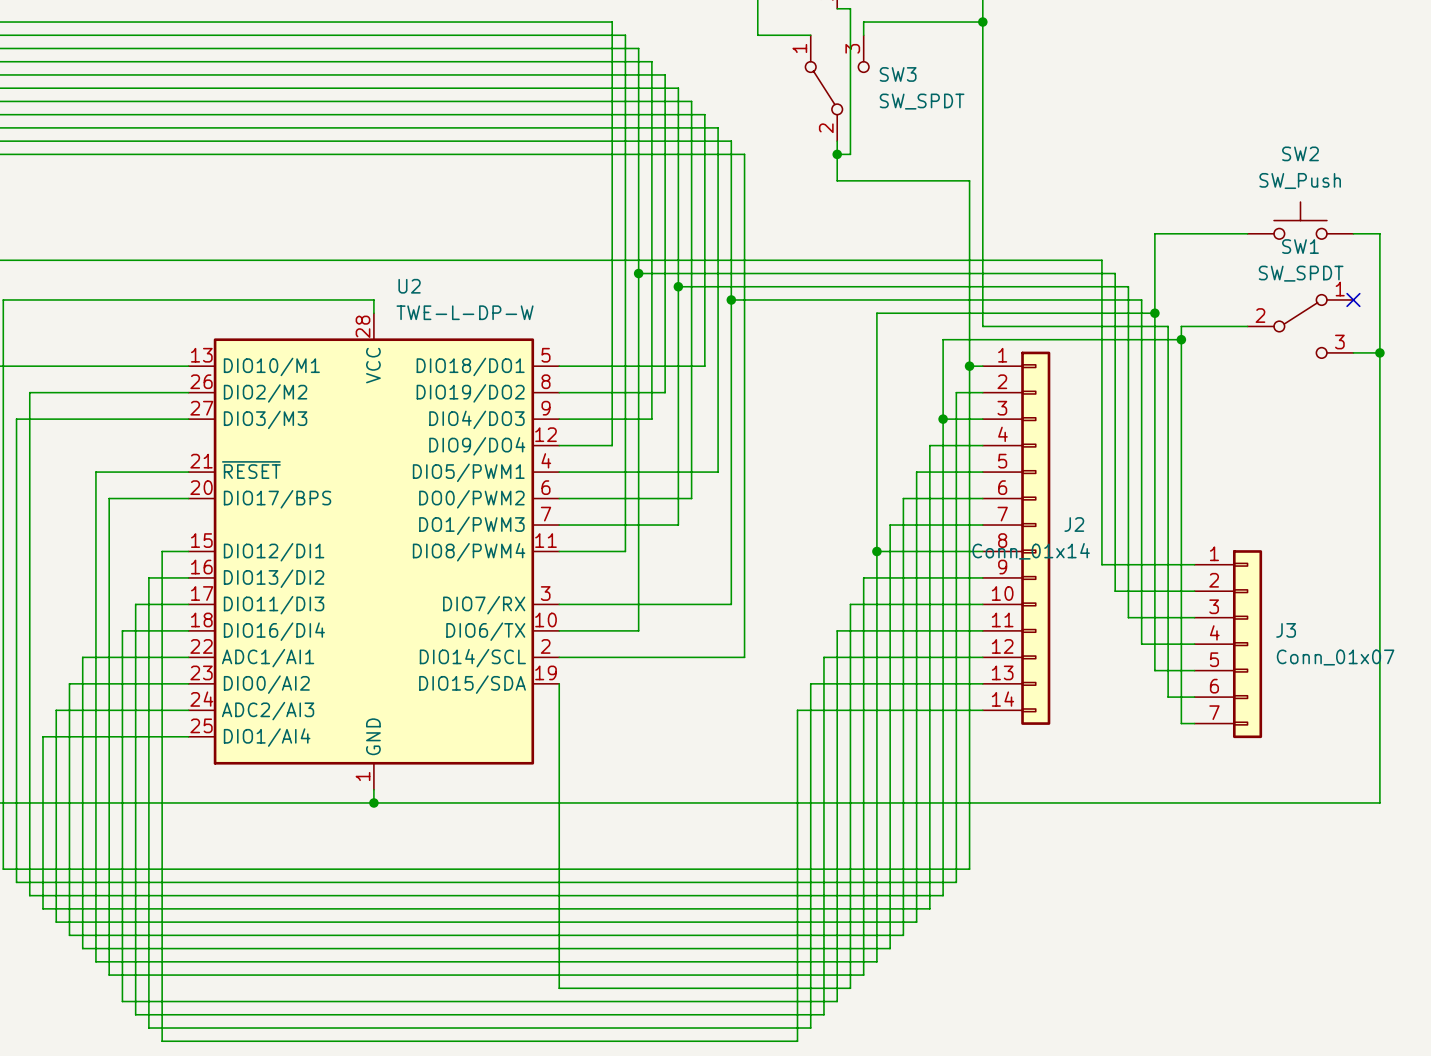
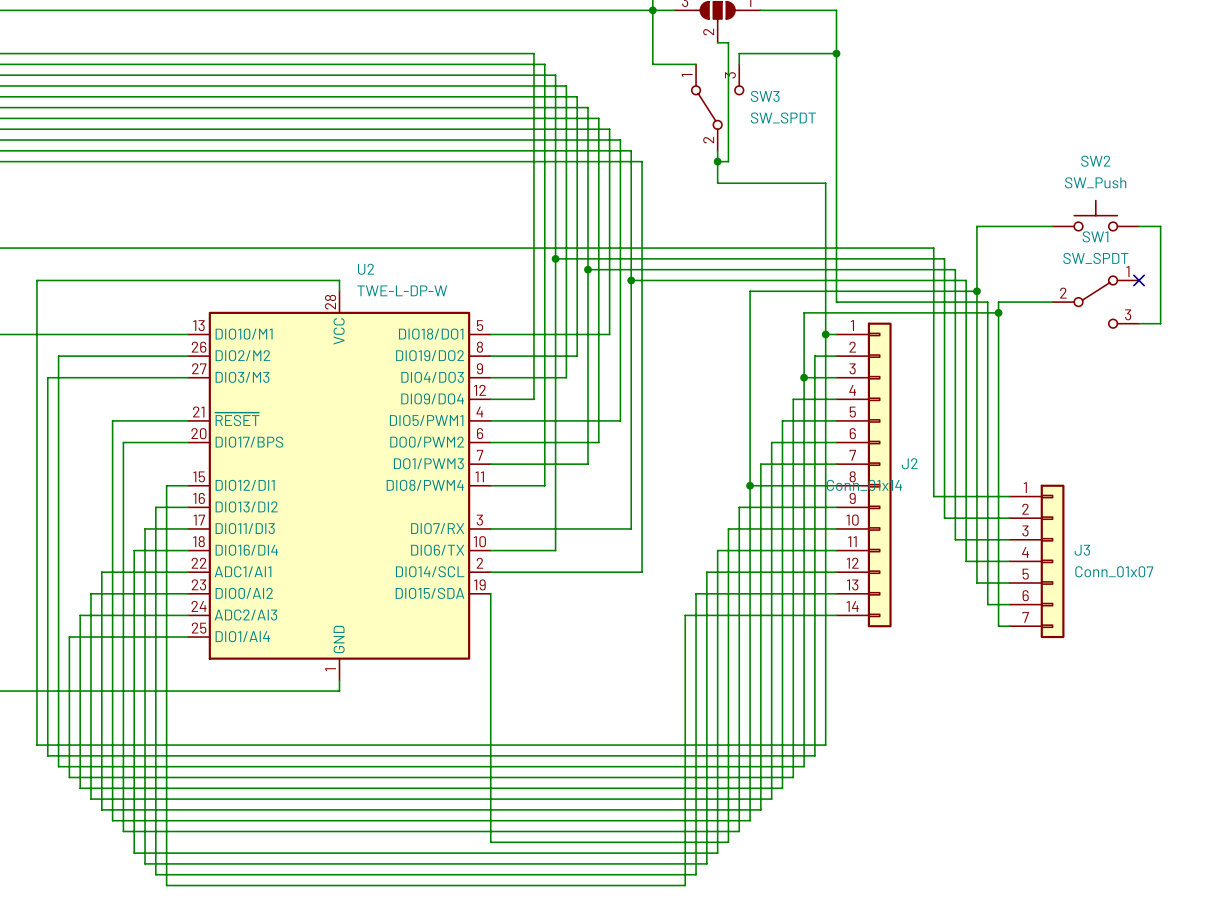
wire: (1379, 352) (1379, 802) (373, 802) -> none
junction: (1379, 352) -> none
junction: (373, 802) -> none

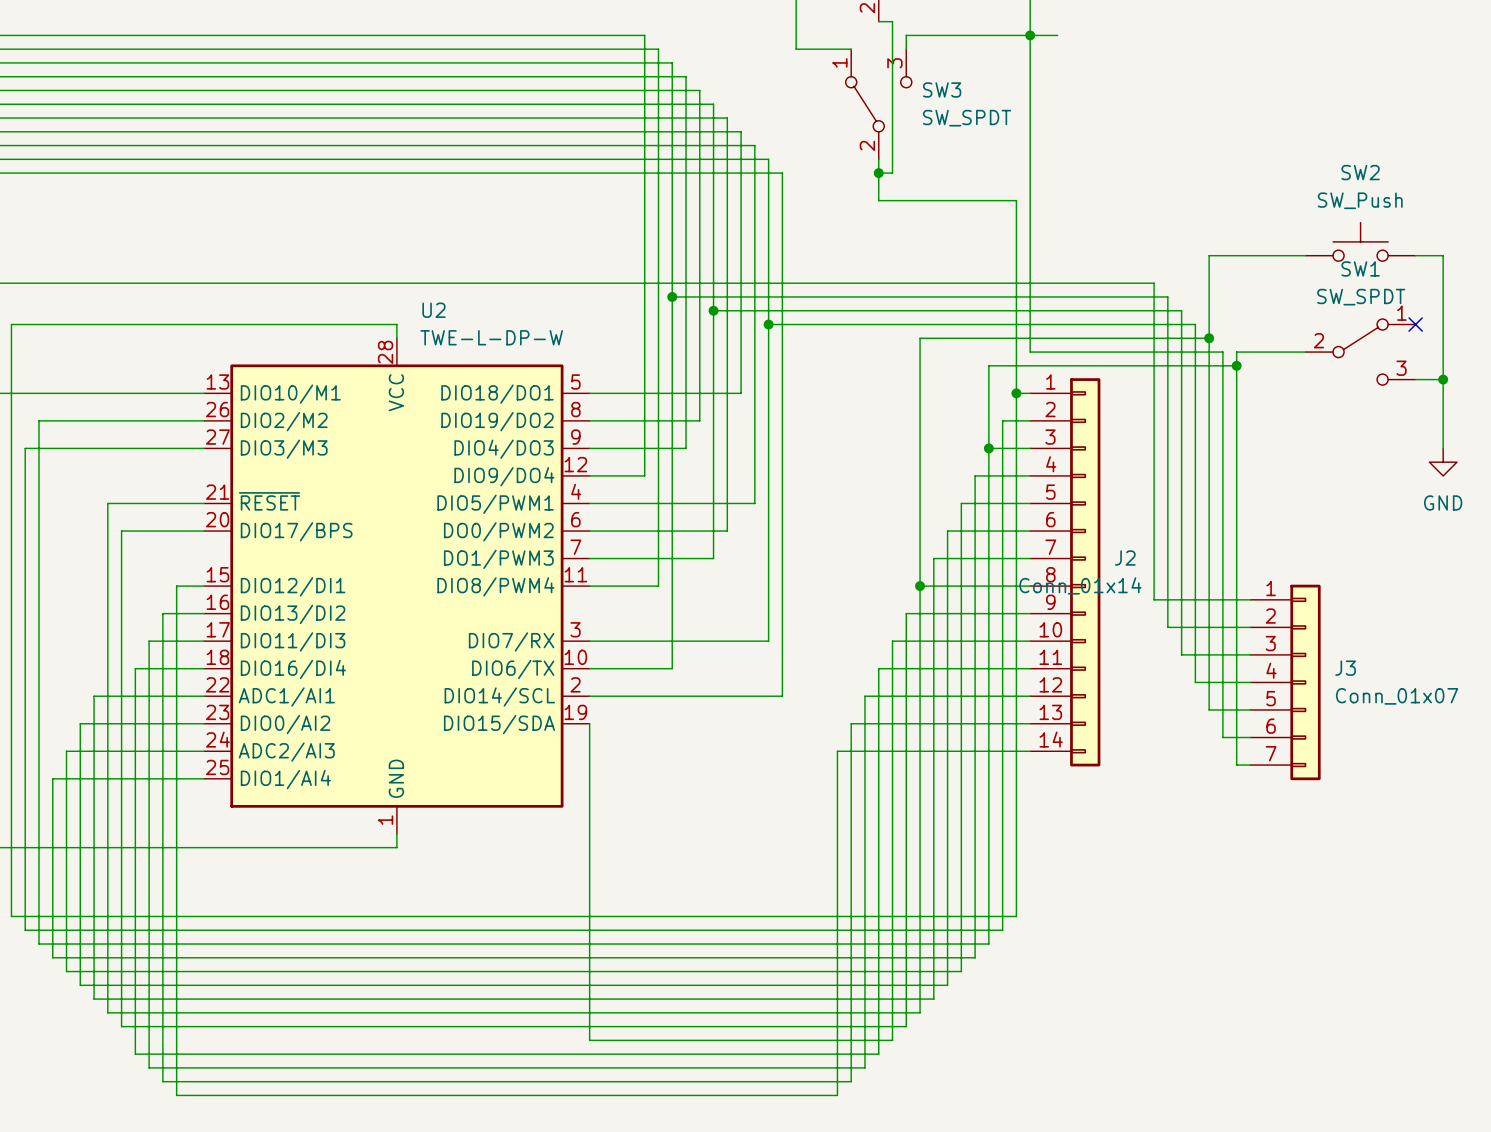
wire: none -> (1030, 35) (1057, 35)
wire: none -> (1443, 379) (1443, 448)
junction: none -> (1443, 379)
power symbol: none -> GND (1443, 462)

